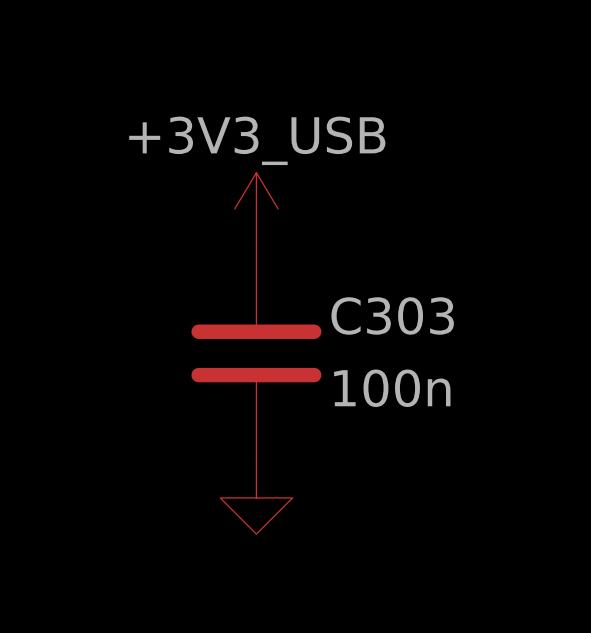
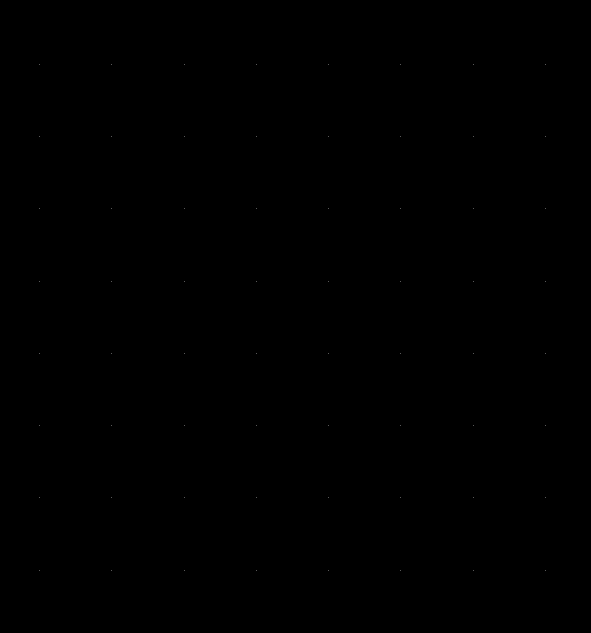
power symbol: +3V3_USB (256, 208) -> none
C303: 100n (256, 353) -> none
power symbol: (256, 497) -> none

